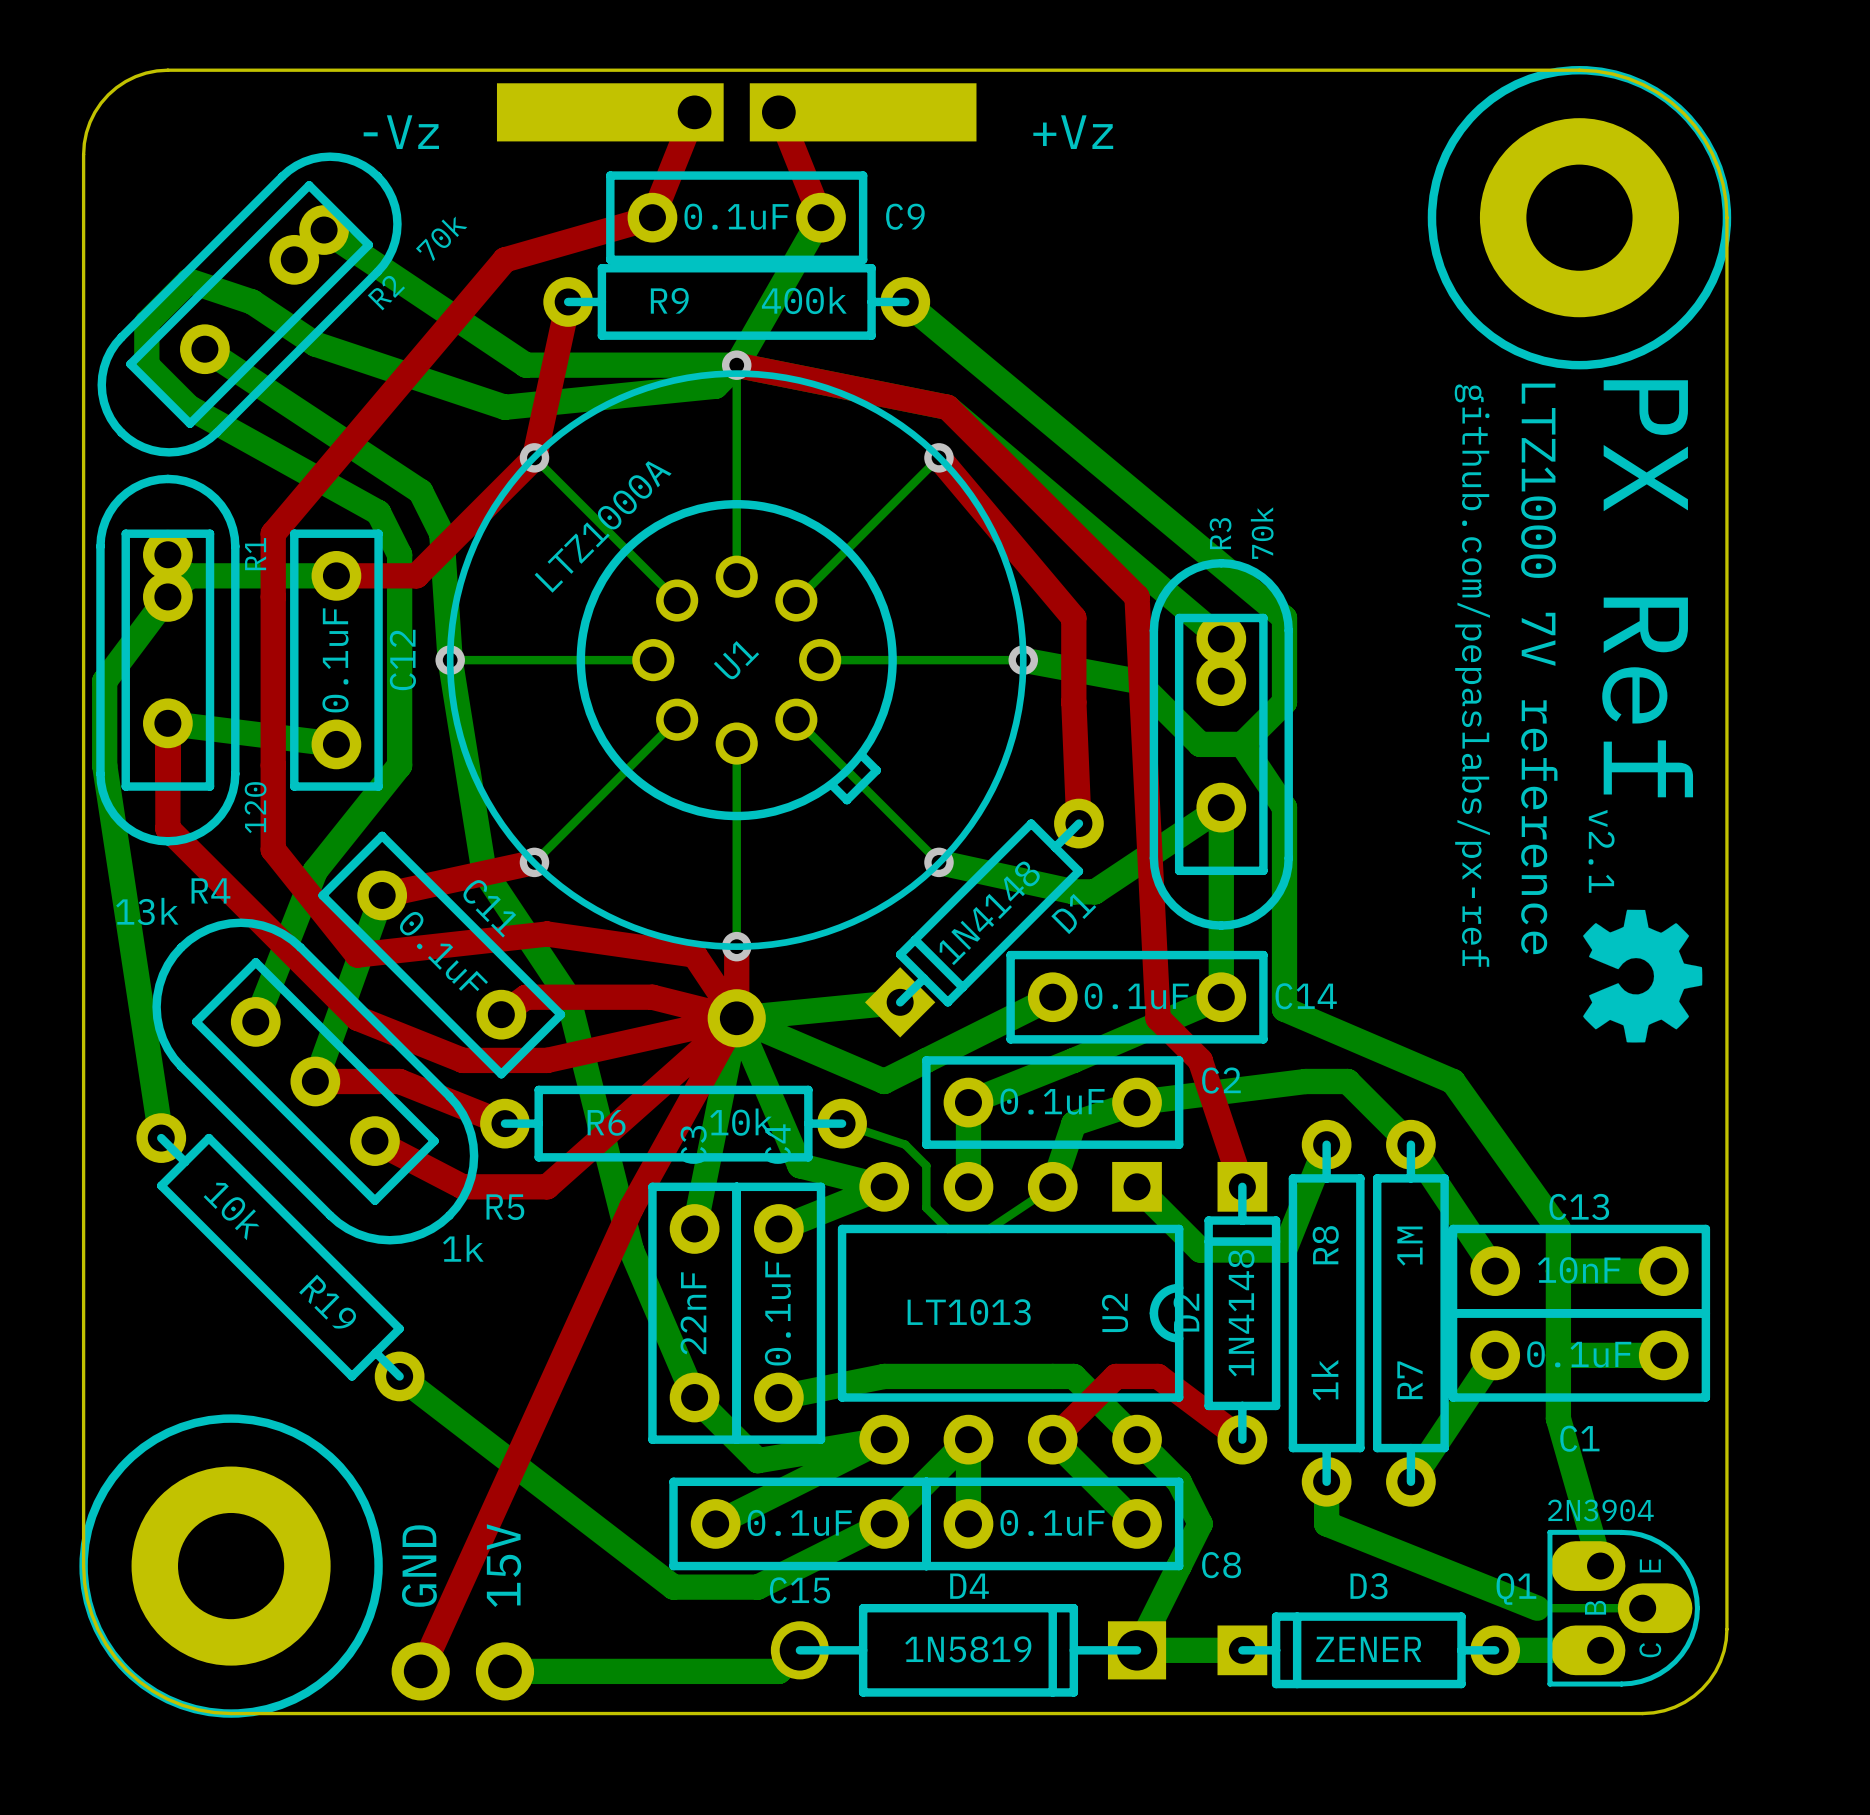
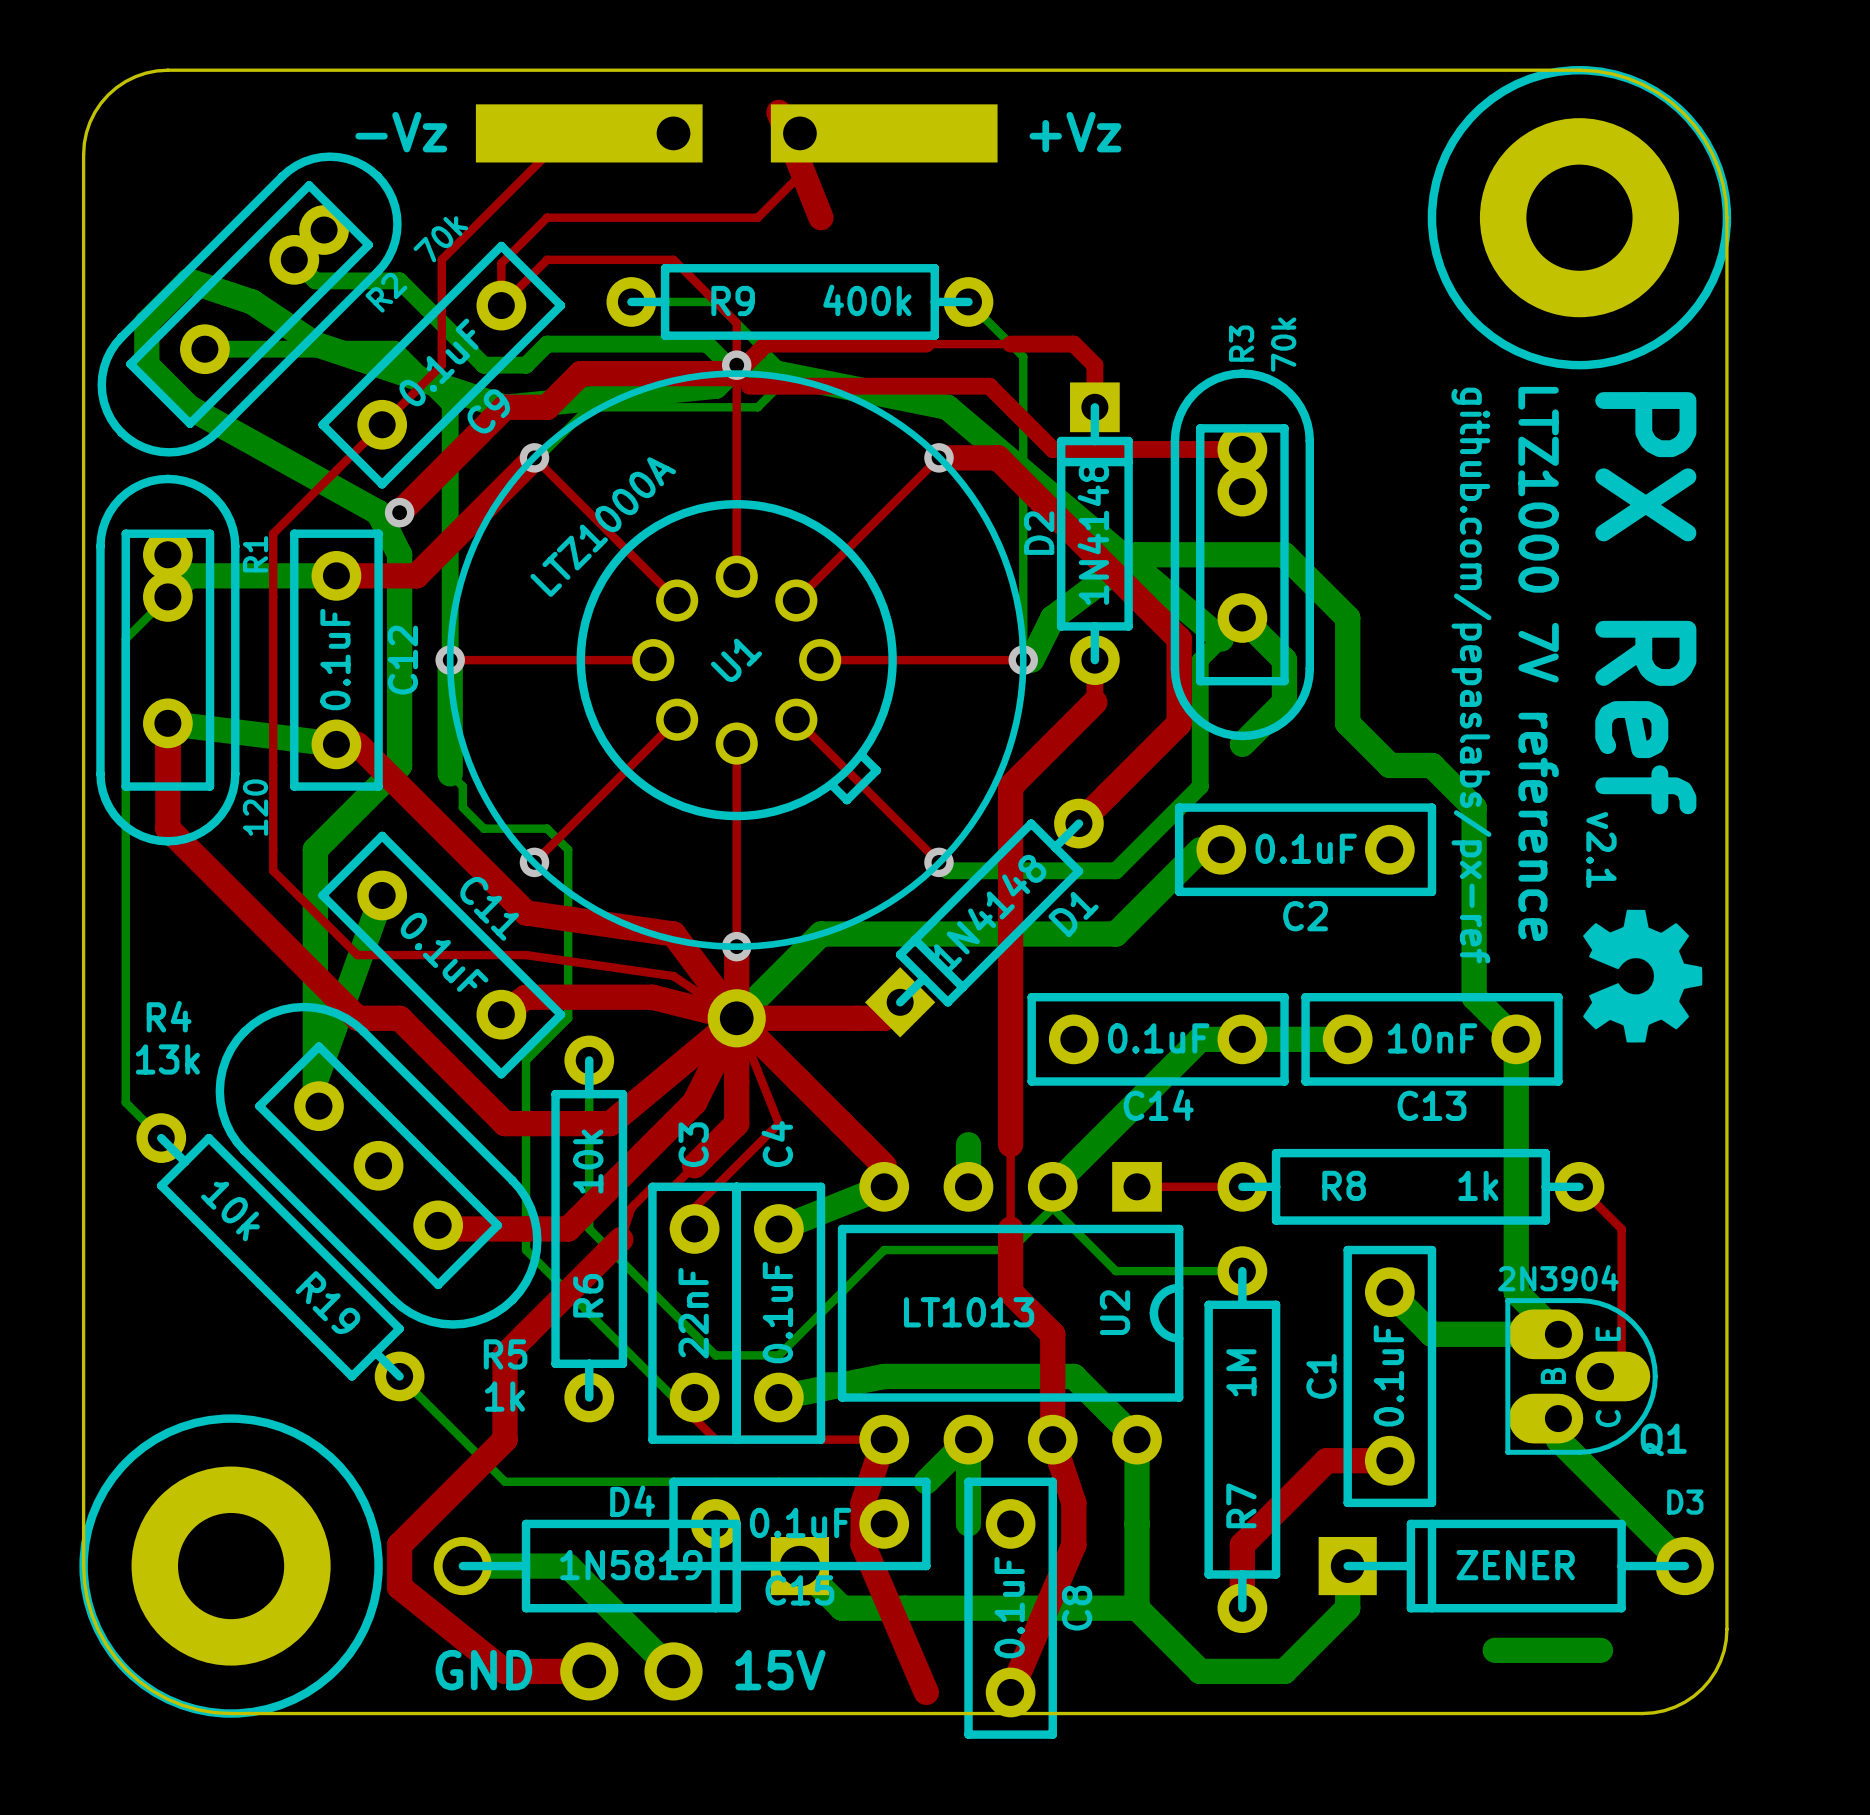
part position: (610, 112) -> (589, 133)
top track: (694, 112) (652, 217) (504, 259) (273, 533) -> (673, 133) (568, 133) (441, 259) (441, 365) (273, 533)
part position: (863, 112) -> (884, 133)
top track: none -> (799, 133) (799, 175) (757, 217) (547, 217) (501, 263) (501, 305) (547, 259) (673, 259) (736, 323) (736, 576)
C9 name position: C9 (905, 216) -> C9 (488, 411)
C9 rotation: 0° (736, 217) -> 45° counterclockwise (441, 365)
C9 position: (736, 217) -> (441, 365)
bottom track: (821, 217) (736, 365) -> none
bottom track: (324, 230) (526, 365) (736, 365) -> none
bottom track: none -> (294, 259) (315, 280) (399, 280) (483, 365) (526, 365) (547, 344) (707, 344) (736, 373)
top track: (568, 301) (534, 457) -> (677, 600) (534, 457)
bottom track: none -> (631, 301) (715, 301) (778, 365) (778, 386) (757, 407) (589, 407) (538, 457)
R9 position: (736, 301) -> (799, 301)
bottom track: (905, 301) (1284, 617) (1284, 660) -> (947, 870) (1115, 870) (1200, 786) (1200, 660) (1242, 617) (1284, 660)
bottom track: none -> (968, 301) (1023, 356) (1023, 660)
bottom track: (204, 349) (420, 491) (441, 533) (450, 660) -> (204, 349) (394, 349) (450, 404) (450, 773) (462, 786) (462, 807) (483, 828) (547, 828) (568, 849) (568, 1018) (526, 1060) (526, 1250) (673, 1397)
bottom track: (736, 365) (736, 576) -> none
top track: (736, 365) (947, 407) (997, 457) -> (796, 600) (938, 457) (997, 457)
top track: none -> (736, 373) (749, 386) (989, 386) (1052, 449) (1242, 449) (1242, 491)
top track: none -> (736, 373) (580, 373) (547, 407) (504, 407) (399, 512)
top track: none -> (736, 373) (766, 344) (1073, 344) (1094, 365) (1094, 407)
bottom track: (534, 457) (677, 600) -> none
bottom track: (938, 457) (796, 600) -> none
top track: (938, 457) (1073, 617) (1073, 702) (1078, 823) -> (1137, 596) (1179, 639) (1179, 723) (1078, 823)
via: none -> (399, 512)
top track width: thick (273, 533) (273, 849) -> thin (273, 533) (273, 849)
bottom track: (167, 596) (104, 681) (104, 765) (161, 1138) -> (167, 596) (125, 639) (125, 1102) (161, 1138)
top track: (1137, 596) (1158, 1018) (1200, 1060) (1242, 1186) -> (1137, 1186) (1242, 1186)
bottom track: (450, 660) (483, 870) (568, 997) (631, 1250) (694, 1397) (757, 1460) (884, 1439) (715, 1523) -> none
bottom track: (450, 660) (653, 660) -> none
top track: none -> (450, 660) (653, 660)
bottom track: (820, 660) (1023, 660) (1137, 681) (1200, 744) (1242, 744) (1284, 807) (1284, 1009) (1453, 1081) (1558, 1228) (1558, 1418) (1600, 1566) -> none
top track: none -> (820, 660) (1023, 660)
bottom track: none -> (1031, 660) (1052, 617) (1137, 554) (1284, 554) (1347, 617) (1347, 723) (1389, 765) (1431, 765) (1474, 807) (1474, 997) (1516, 1039) (1516, 1292) (1558, 1334) (1431, 1334) (1389, 1292)
top track: none -> (1094, 660) (1094, 702) (1010, 786) (1010, 1292) (1052, 1334) (1052, 1439) (1073, 1502) (1073, 1545) (1010, 1692)
bottom track: (677, 719) (534, 862) -> none
bottom track: (796, 719) (938, 862) (1073, 891) (1094, 891) (1221, 807) (1221, 997) (1073, 1060) (968, 1102) (968, 1144) -> none
top track: none -> (796, 719) (938, 862)
bottom track: (736, 743) (736, 946) -> none
top track: none -> (736, 743) (736, 946)
top track: none -> (336, 744) (357, 744) (526, 912) (673, 934) (736, 1018)
R3 position: (1221, 744) -> (1242, 554)
bottom track: (399, 765) (315, 870) (255, 1021) -> (399, 765) (315, 849) (315, 1102) (318, 1106)
top track: (273, 849) (357, 955) (547, 934) (694, 955) (736, 1018) -> (273, 849) (273, 870) (357, 955) (526, 955) (673, 976) (736, 1018)
top track: (534, 862) (382, 895) -> (534, 862) (677, 719)
text position: R4 (210, 890) -> R4 (169, 1016)
text position: 13k (147, 911) -> 13k (167, 1059)
C14 name position: C14 (1306, 996) -> C14 (1158, 1105)
bottom track: (1052, 997) (884, 1081) (736, 1018) -> (1221, 849) (1200, 849) (1115, 934) (821, 934) (736, 1018)
C2 position: (1137, 997) -> (1305, 849)
bottom track: (900, 1002) (736, 1018) -> none
top track: none -> (900, 1002) (884, 1018) (736, 1018)
top track: (357, 1018) (462, 1060) (547, 1060) (736, 1018) -> (357, 1018) (399, 1018) (504, 1123) (610, 1123) (736, 1018)
bottom track: (736, 1018) (799, 1165) (884, 1186) -> none
bottom track: (736, 1018) (694, 1228) -> none
top track: (736, 1018) (547, 1186) (462, 1186) (374, 1141) -> (736, 1018) (694, 1102) (568, 1228) (441, 1228) (438, 1225)
top track: (736, 1018) (631, 1207) (420, 1671) -> (736, 1018) (736, 1123) (673, 1186) (652, 1186) (631, 1207) (620, 1239) (504, 1355) (504, 1439) (399, 1545) (399, 1587) (504, 1671) (589, 1671)
top track: none -> (736, 1018) (778, 1123) (673, 1228)
top track: none -> (736, 1018) (884, 1165) (884, 1186)
bottom track: none -> (1347, 1039) (1200, 1039) (1052, 1186) (1052, 1207)
bottom track: none -> (589, 1060) (589, 1228) (715, 1355) (778, 1355) (884, 1250) (1010, 1250) (1052, 1207)
C2 name position: C2 (1221, 1080) -> C2 (1305, 916)
top track: (315, 1081) (399, 1081) (504, 1123) -> none
part position: (315, 1081) -> (378, 1165)
C14 position: (1052, 1102) -> (1158, 1039)
R6 rotation: 0° (673, 1123) -> 90° counterclockwise (589, 1228)
bottom track: (842, 1123) (905, 1144) (926, 1165) (926, 1207) (947, 1228) (989, 1228) (1052, 1186) (1073, 1123) (1137, 1102) (1305, 1081) (1347, 1081) (1410, 1144) (1495, 1271) -> none
bottom track: (1326, 1144) (1284, 1250) (1200, 1250) (1137, 1186) -> none
top track: none -> (1579, 1186) (1621, 1228) (1621, 1355) (1600, 1376)
C13 name position: C13 (1579, 1206) -> C13 (1431, 1105)
text position: R5 (505, 1207) -> R5 (505, 1354)
bottom track: none -> (1052, 1207) (1115, 1271) (1242, 1271)
text position: 1k (463, 1248) -> 1k (504, 1396)
bottom track: (1558, 1271) (1663, 1271) -> none
C13 position: (1579, 1271) -> (1431, 1039)
D2 position: (1242, 1313) -> (1094, 533)
R8 rotation: 0° (1326, 1313) -> 90° counterclockwise (1410, 1186)
R7 position: (1410, 1313) -> (1242, 1439)
bottom track: (1495, 1355) (1410, 1481) -> none
bottom track: (1558, 1355) (1663, 1355) -> none
C1 rotation: 0° (1579, 1355) -> 90° clockwise (1389, 1376)
C1 position: (1579, 1355) -> (1389, 1376)
bottom track: (399, 1376) (673, 1587) (757, 1587) (884, 1523) (926, 1481) -> (399, 1376) (504, 1481) (926, 1481)
bottom track: none -> (821, 1376) (1073, 1376) (1137, 1439) (1137, 1608)
top track: none -> (673, 1397) (715, 1439) (884, 1439) (863, 1502) (863, 1545) (926, 1692)
bottom track: none -> (1558, 1418) (1558, 1439) (1684, 1566)
bottom track: (1052, 1439) (1137, 1523) -> none
top track: (1052, 1439) (1115, 1376) (1158, 1376) (1242, 1439) -> none
bottom track: (1137, 1439) (1179, 1481) (1200, 1523) (1137, 1650) (1242, 1650) -> none
top track: none -> (1389, 1460) (1326, 1460) (1242, 1545) (1242, 1608)
bottom track: (1326, 1481) (1326, 1523) (1537, 1608) (1642, 1608) -> none
C8 rotation: 0° (1052, 1523) -> 90° clockwise (1010, 1608)
text rotation: 0° (504, 1565) -> 90° clockwise (780, 1670)
text position: 15V (504, 1565) -> 15V (780, 1670)
C8 name position: C8 (1221, 1565) -> C8 (1077, 1608)
text rotation: 0° (419, 1566) -> 90° clockwise (483, 1670)
bottom track: none -> (462, 1566) (568, 1566) (673, 1671)
bottom track: none -> (799, 1566) (842, 1608) (1137, 1608)
bottom track: none -> (1347, 1566) (1347, 1608) (1284, 1671) (1200, 1671) (1137, 1608)
D3 name position: D3 (1369, 1586) -> D3 (1685, 1502)
Q1 name position: Q1 (1516, 1588) -> Q1 (1663, 1439)
Q1 position: (1623, 1608) -> (1581, 1376)
D3 footprint: [1217, 1612, 1521, 1689] -> [1318, 1519, 1714, 1613]
bottom track: (799, 1650) (778, 1671) (504, 1671) -> none
D4 position: (968, 1650) -> (631, 1566)
part: (420, 1671) -> none
part: (504, 1671) -> none
part: none -> (589, 1671)
part: none -> (673, 1671)

